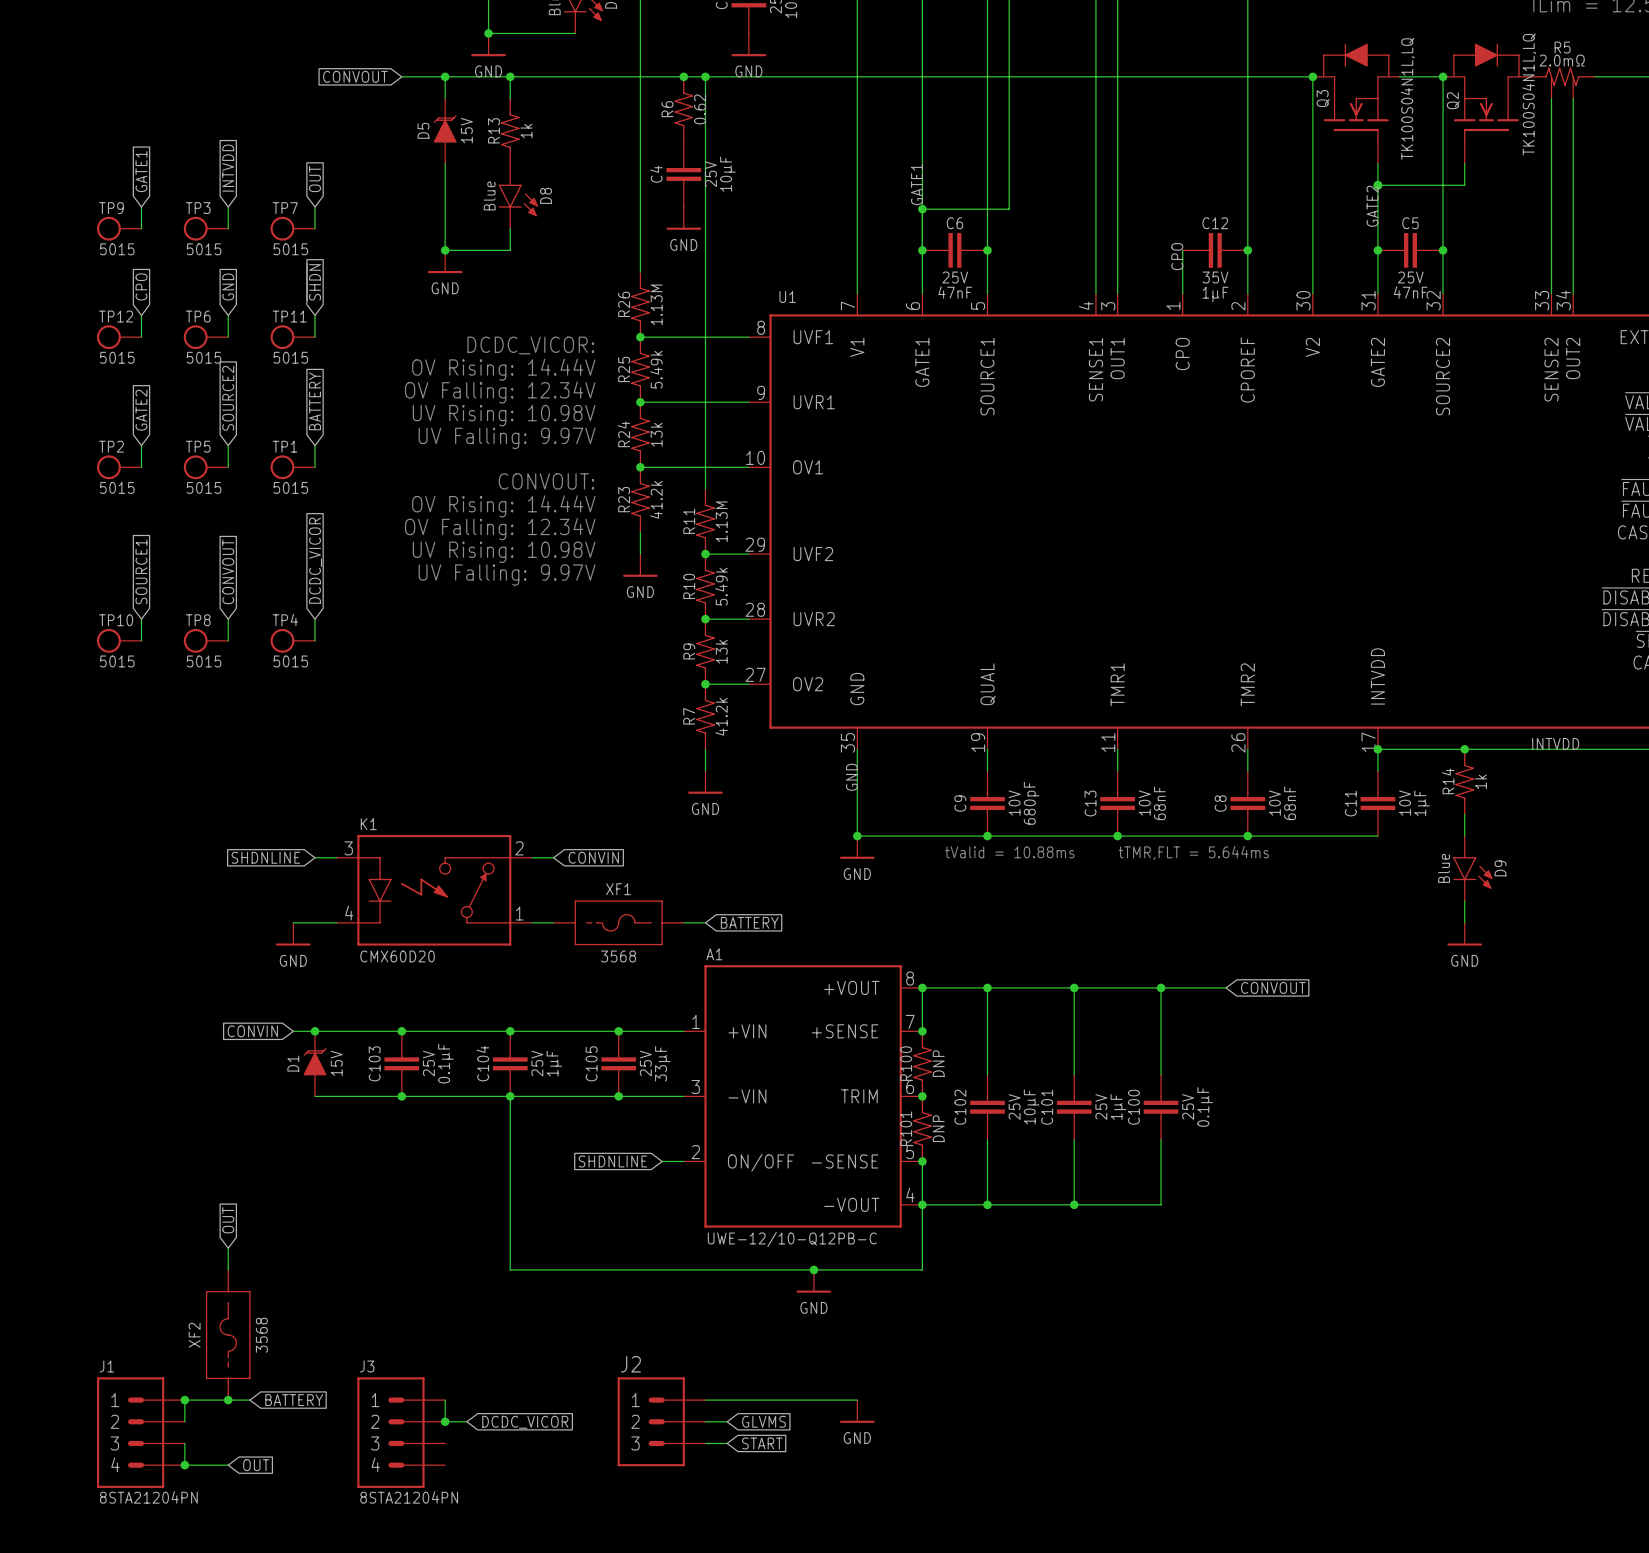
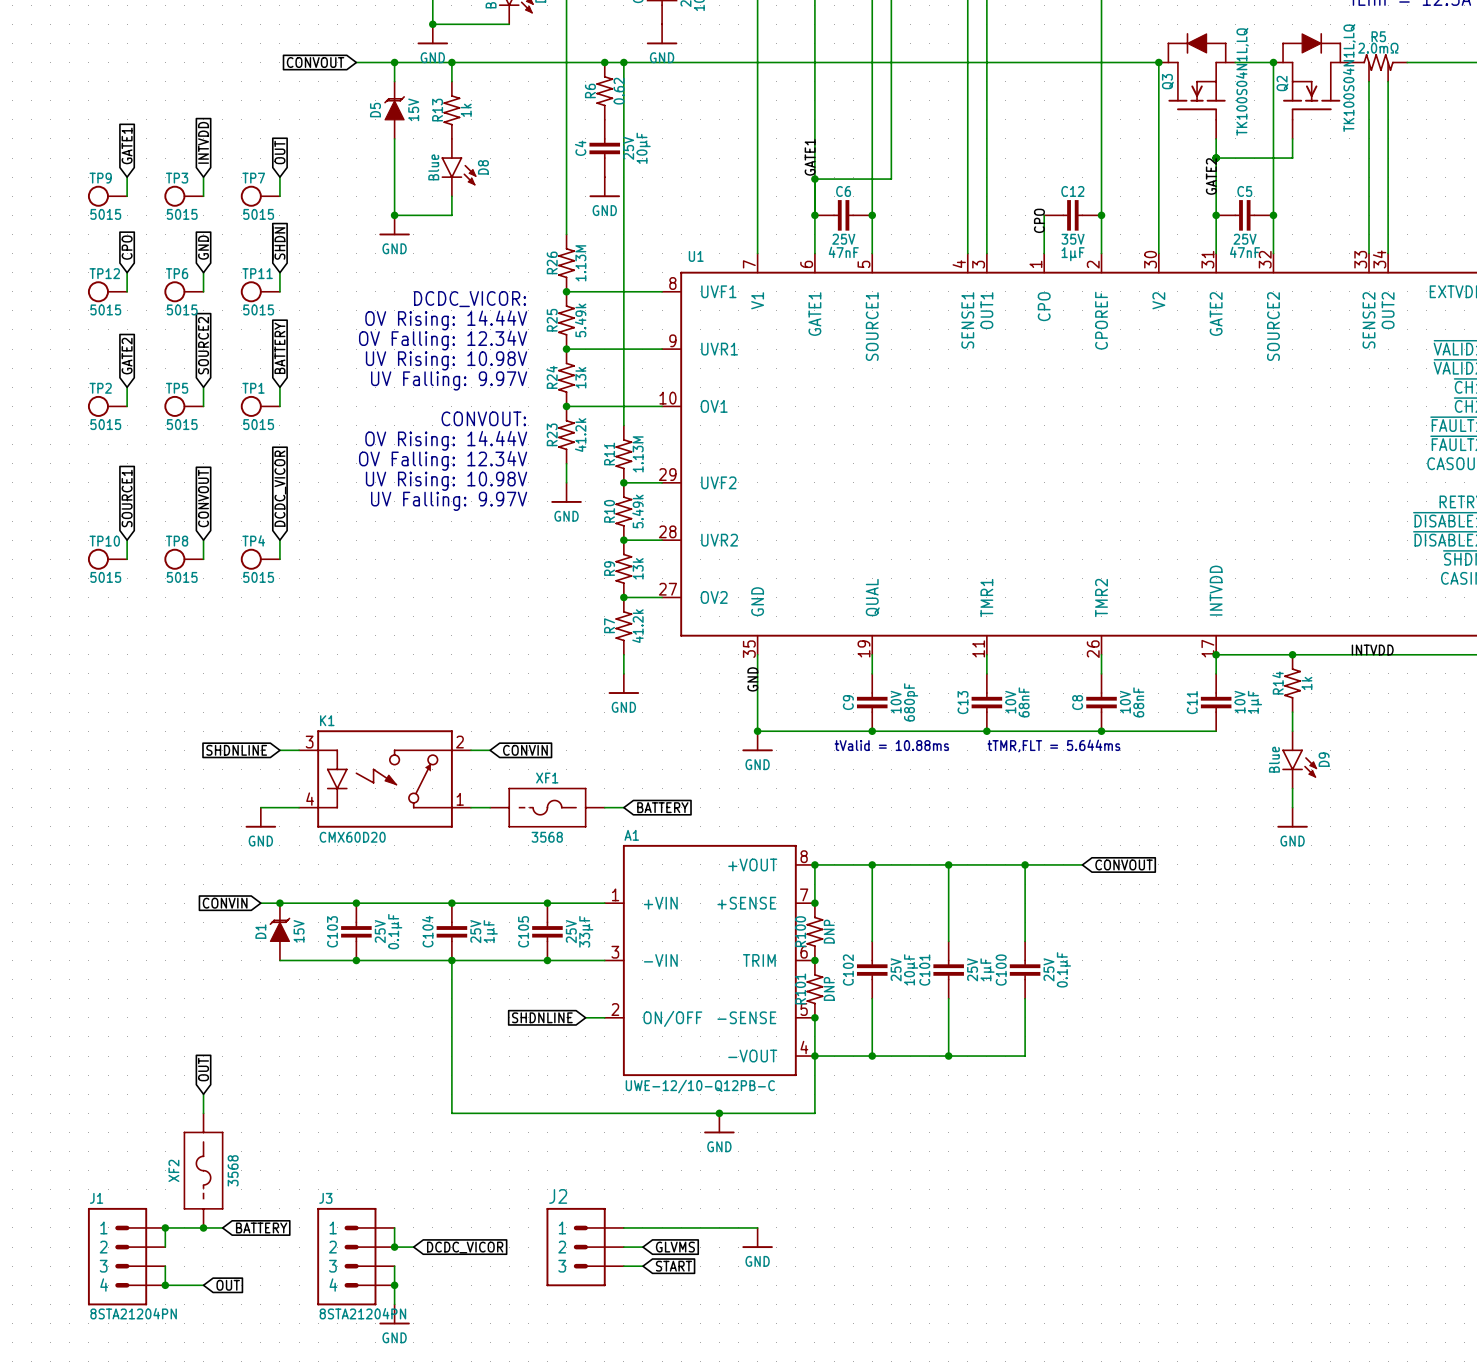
wire: none -> (394, 1266) (394, 1304)
junction: none -> (394, 1285)
power symbol: none -> GND (394, 1314)

